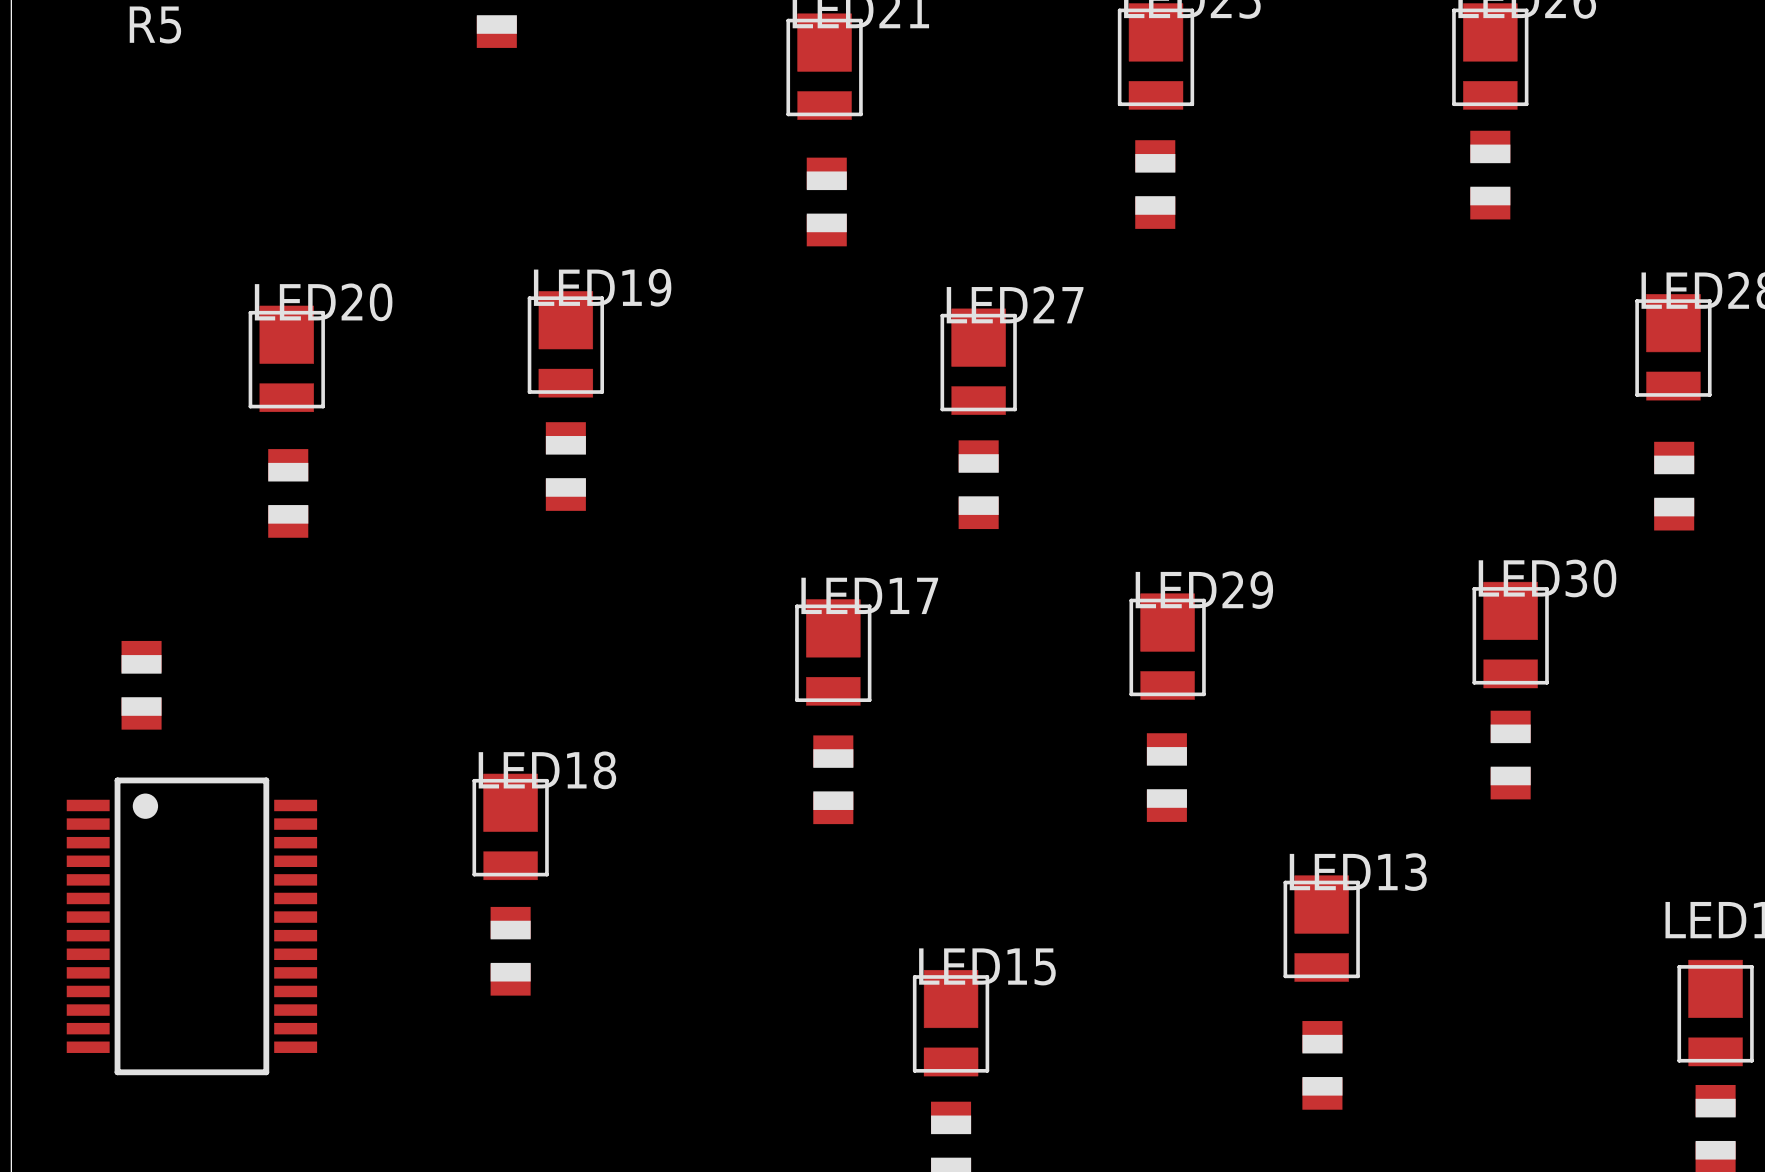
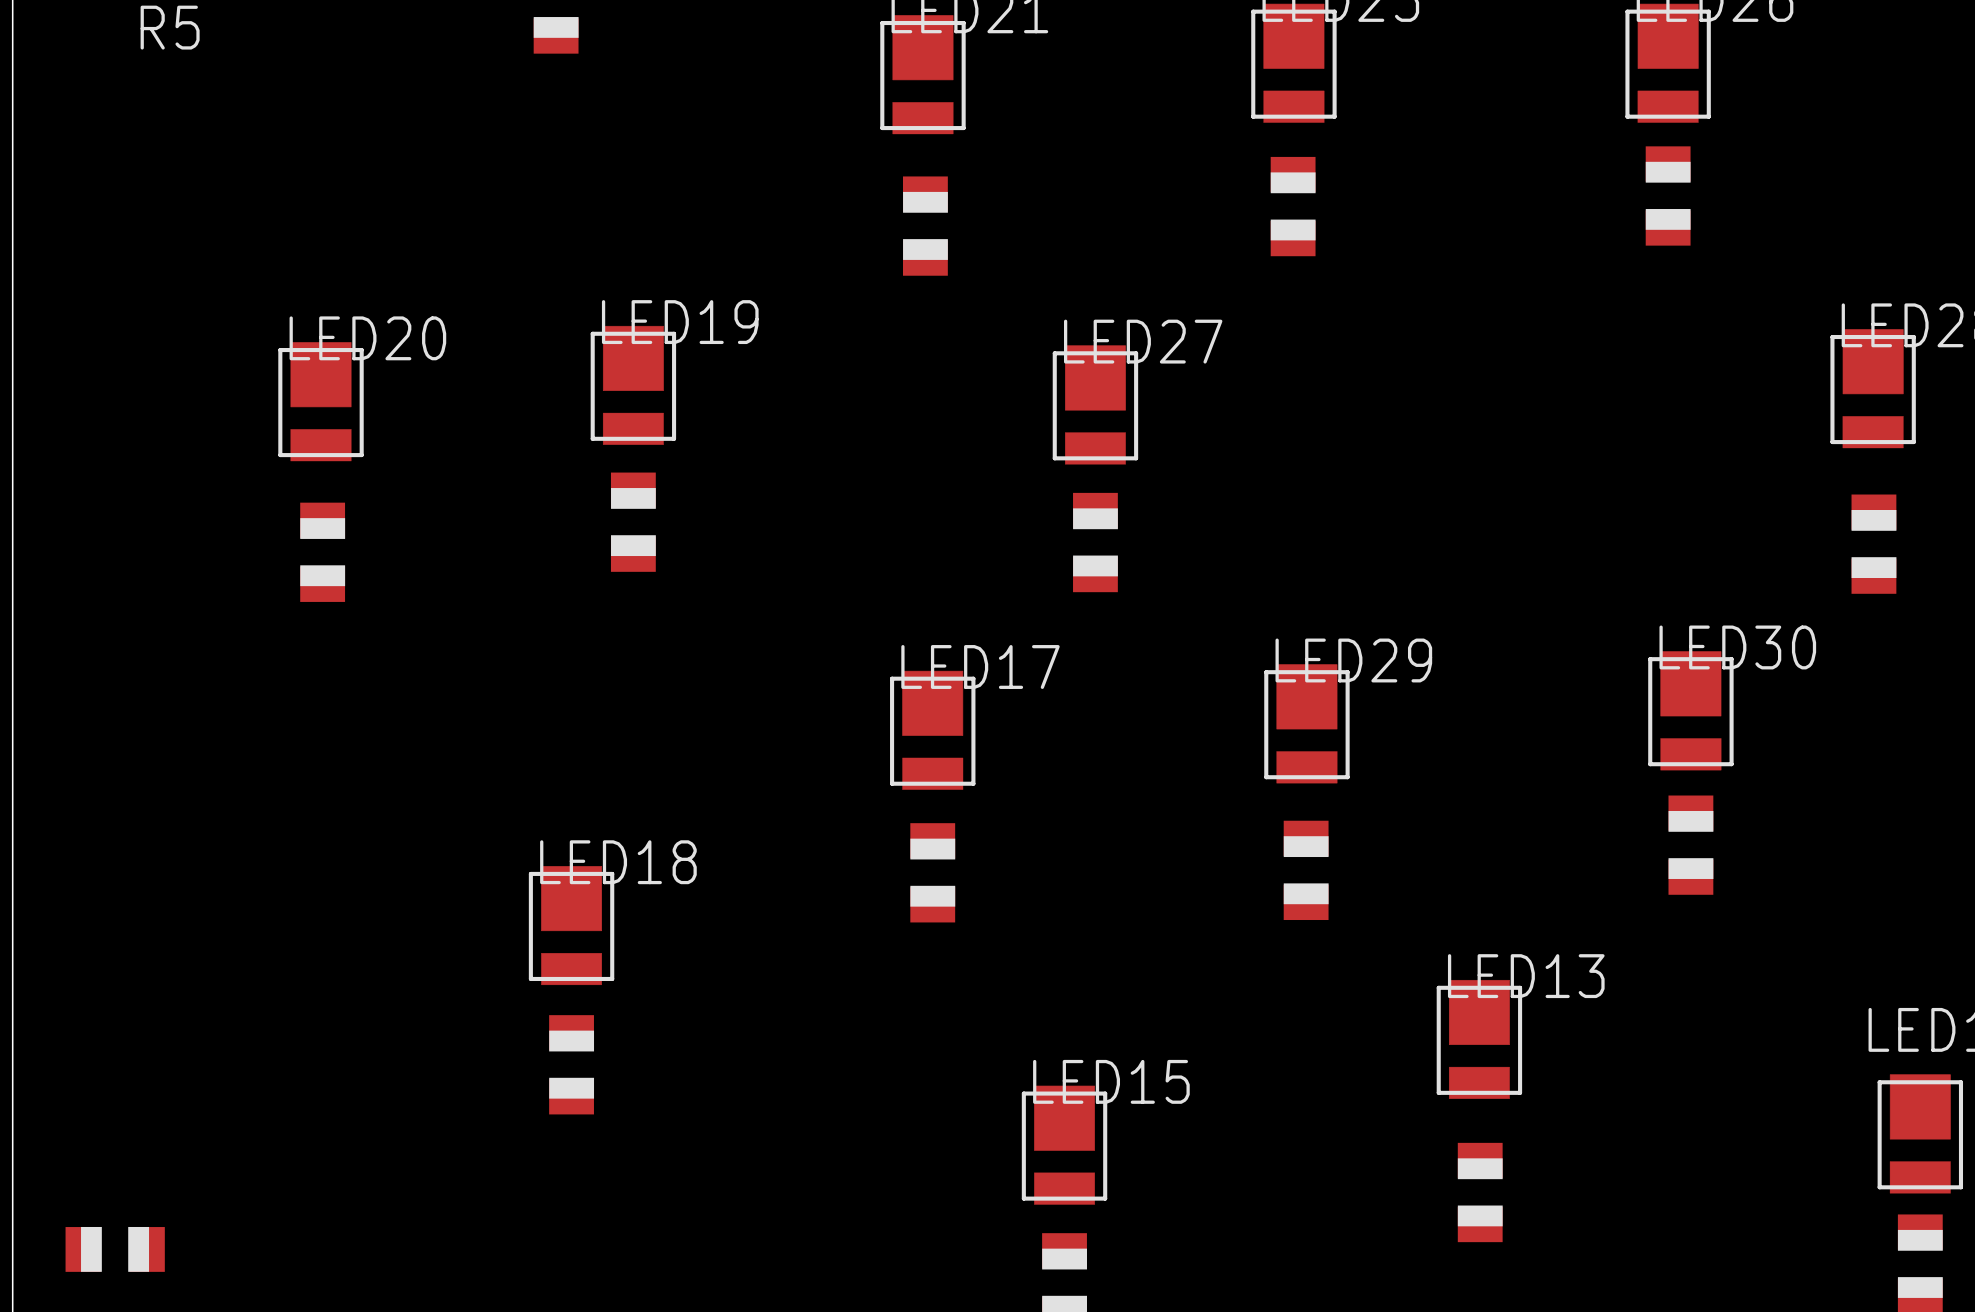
part rotation: 0° (141, 685) -> 90° clockwise (115, 1249)
part position: (141, 685) -> (115, 1249)
part: (191, 926) -> none

